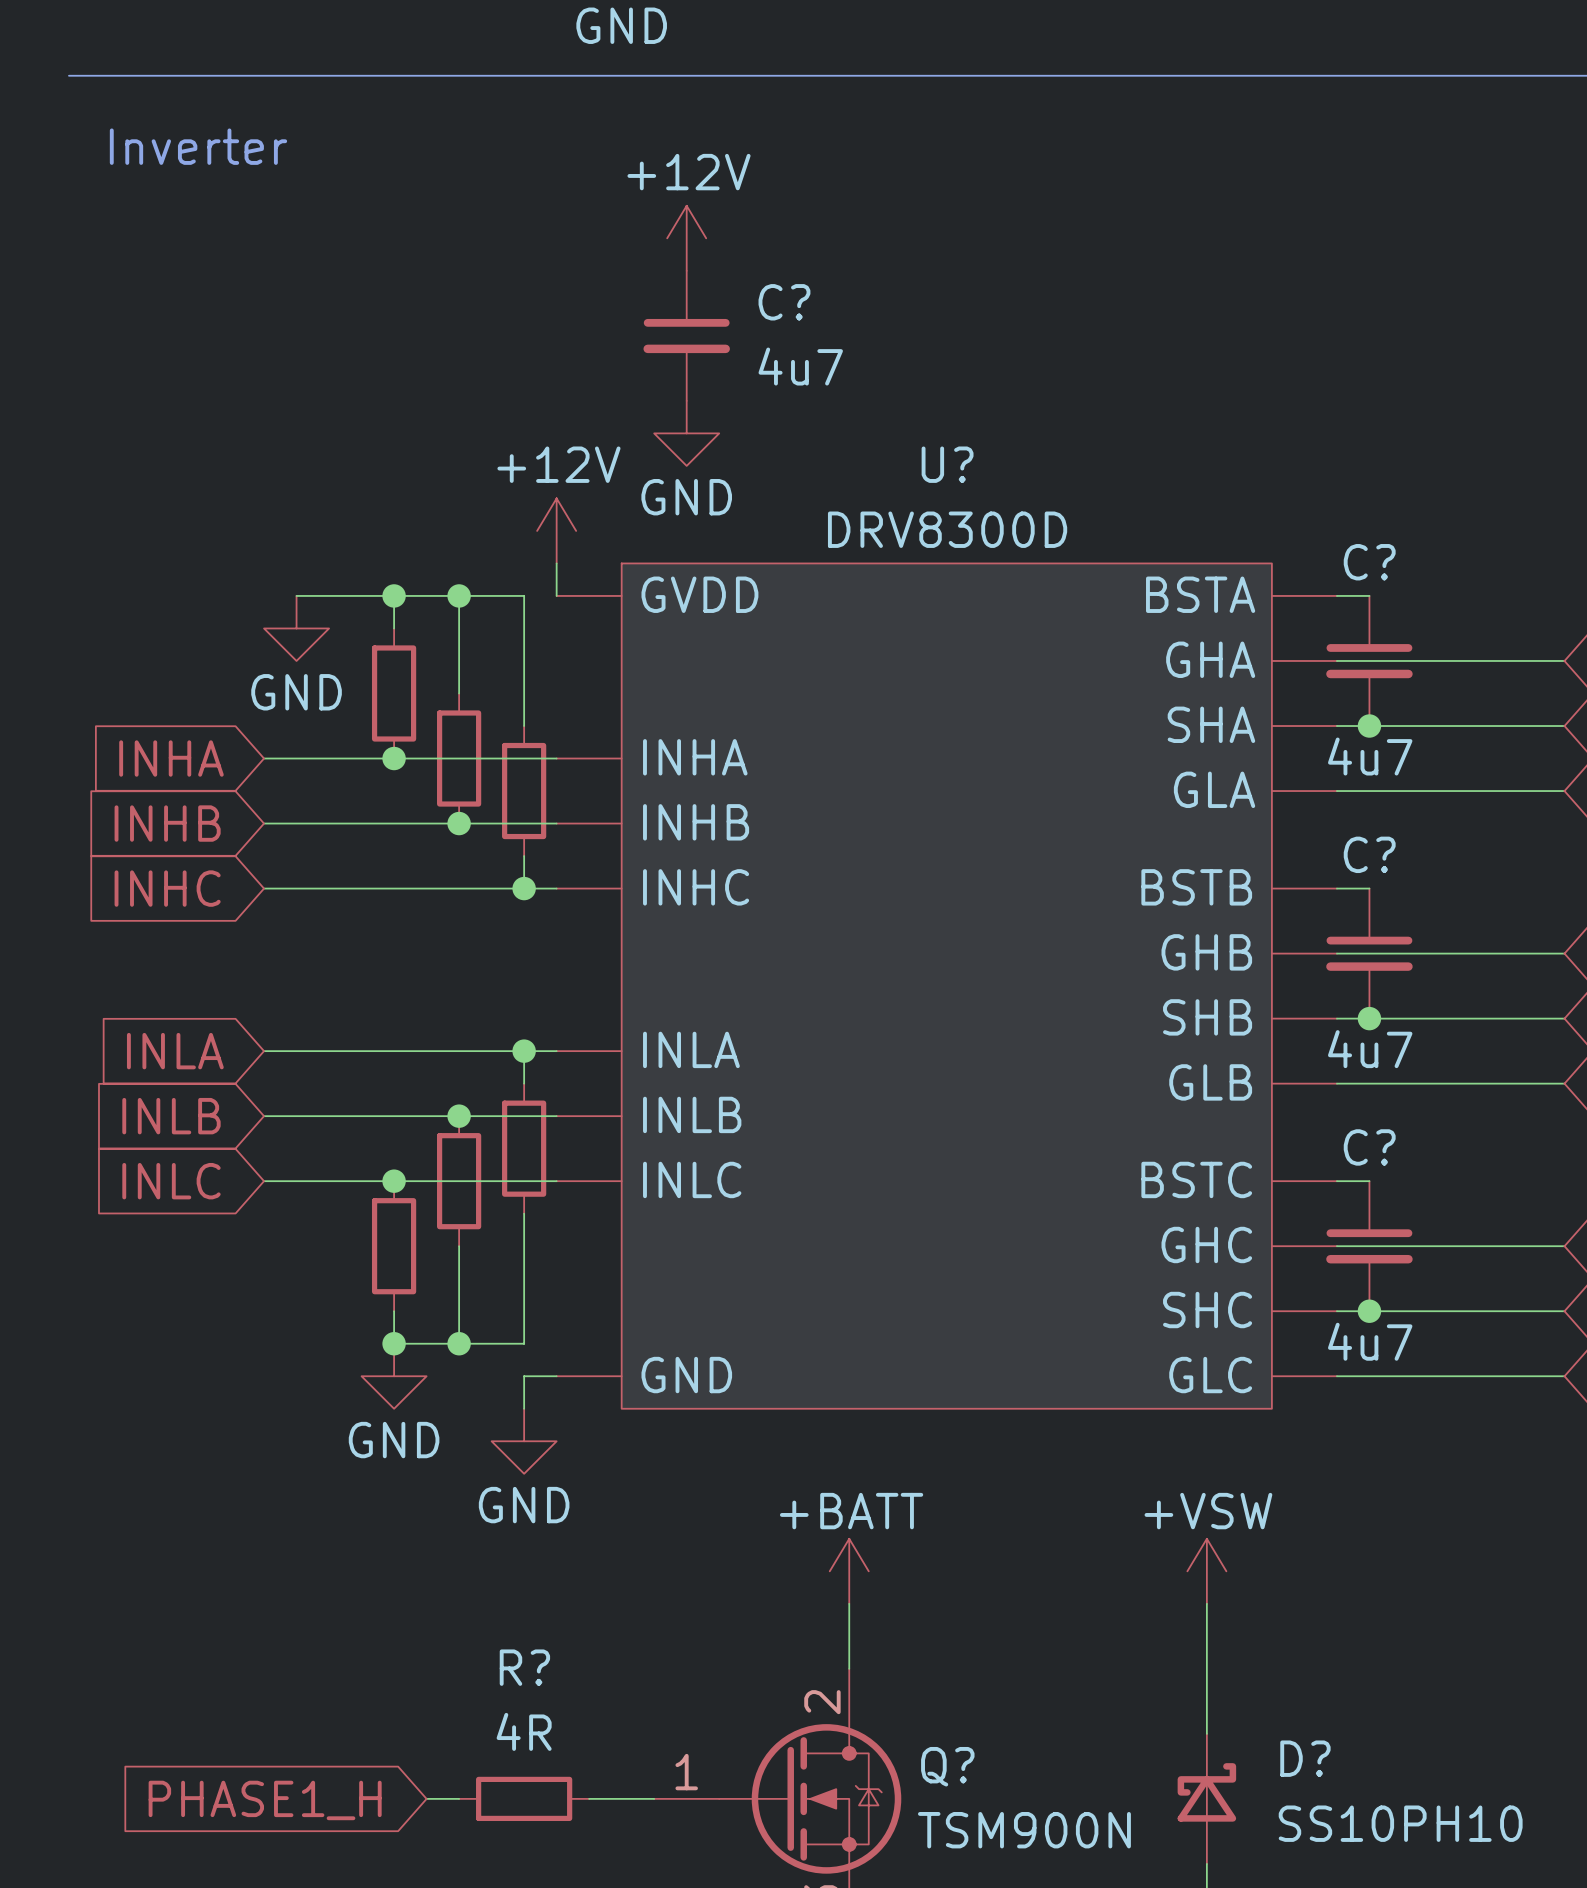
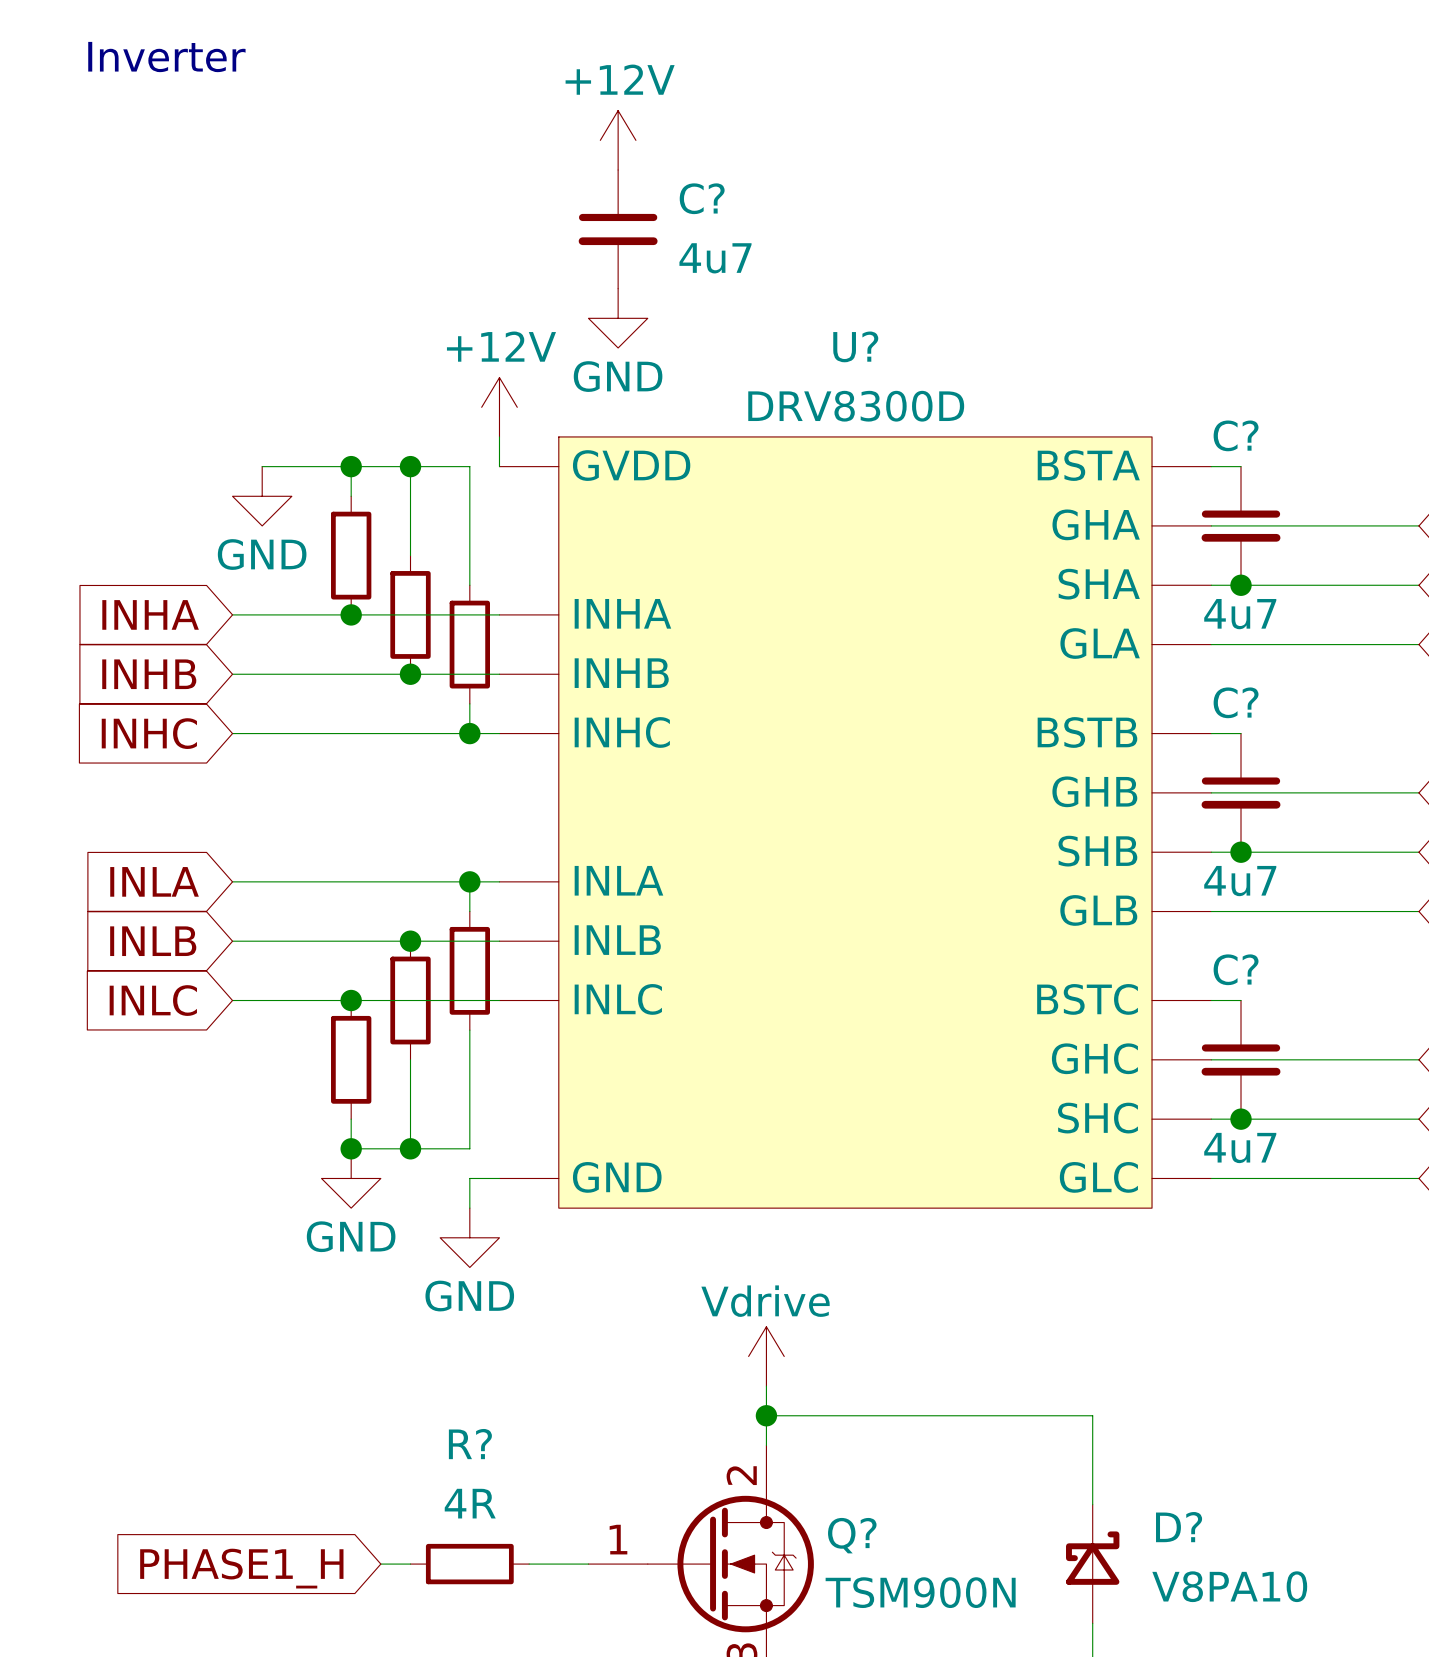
power symbol: +BATT (849, 1571) -> Vdrive (766, 1356)
power symbol: +VSW (1206, 1571) -> none
wire: (1206, 1603) (1206, 1636) -> (766, 1415) (1092, 1415)
junction: none -> (766, 1415)
D? value: SS10PH10 (1400, 1823) -> V8PA10 (1229, 1586)

